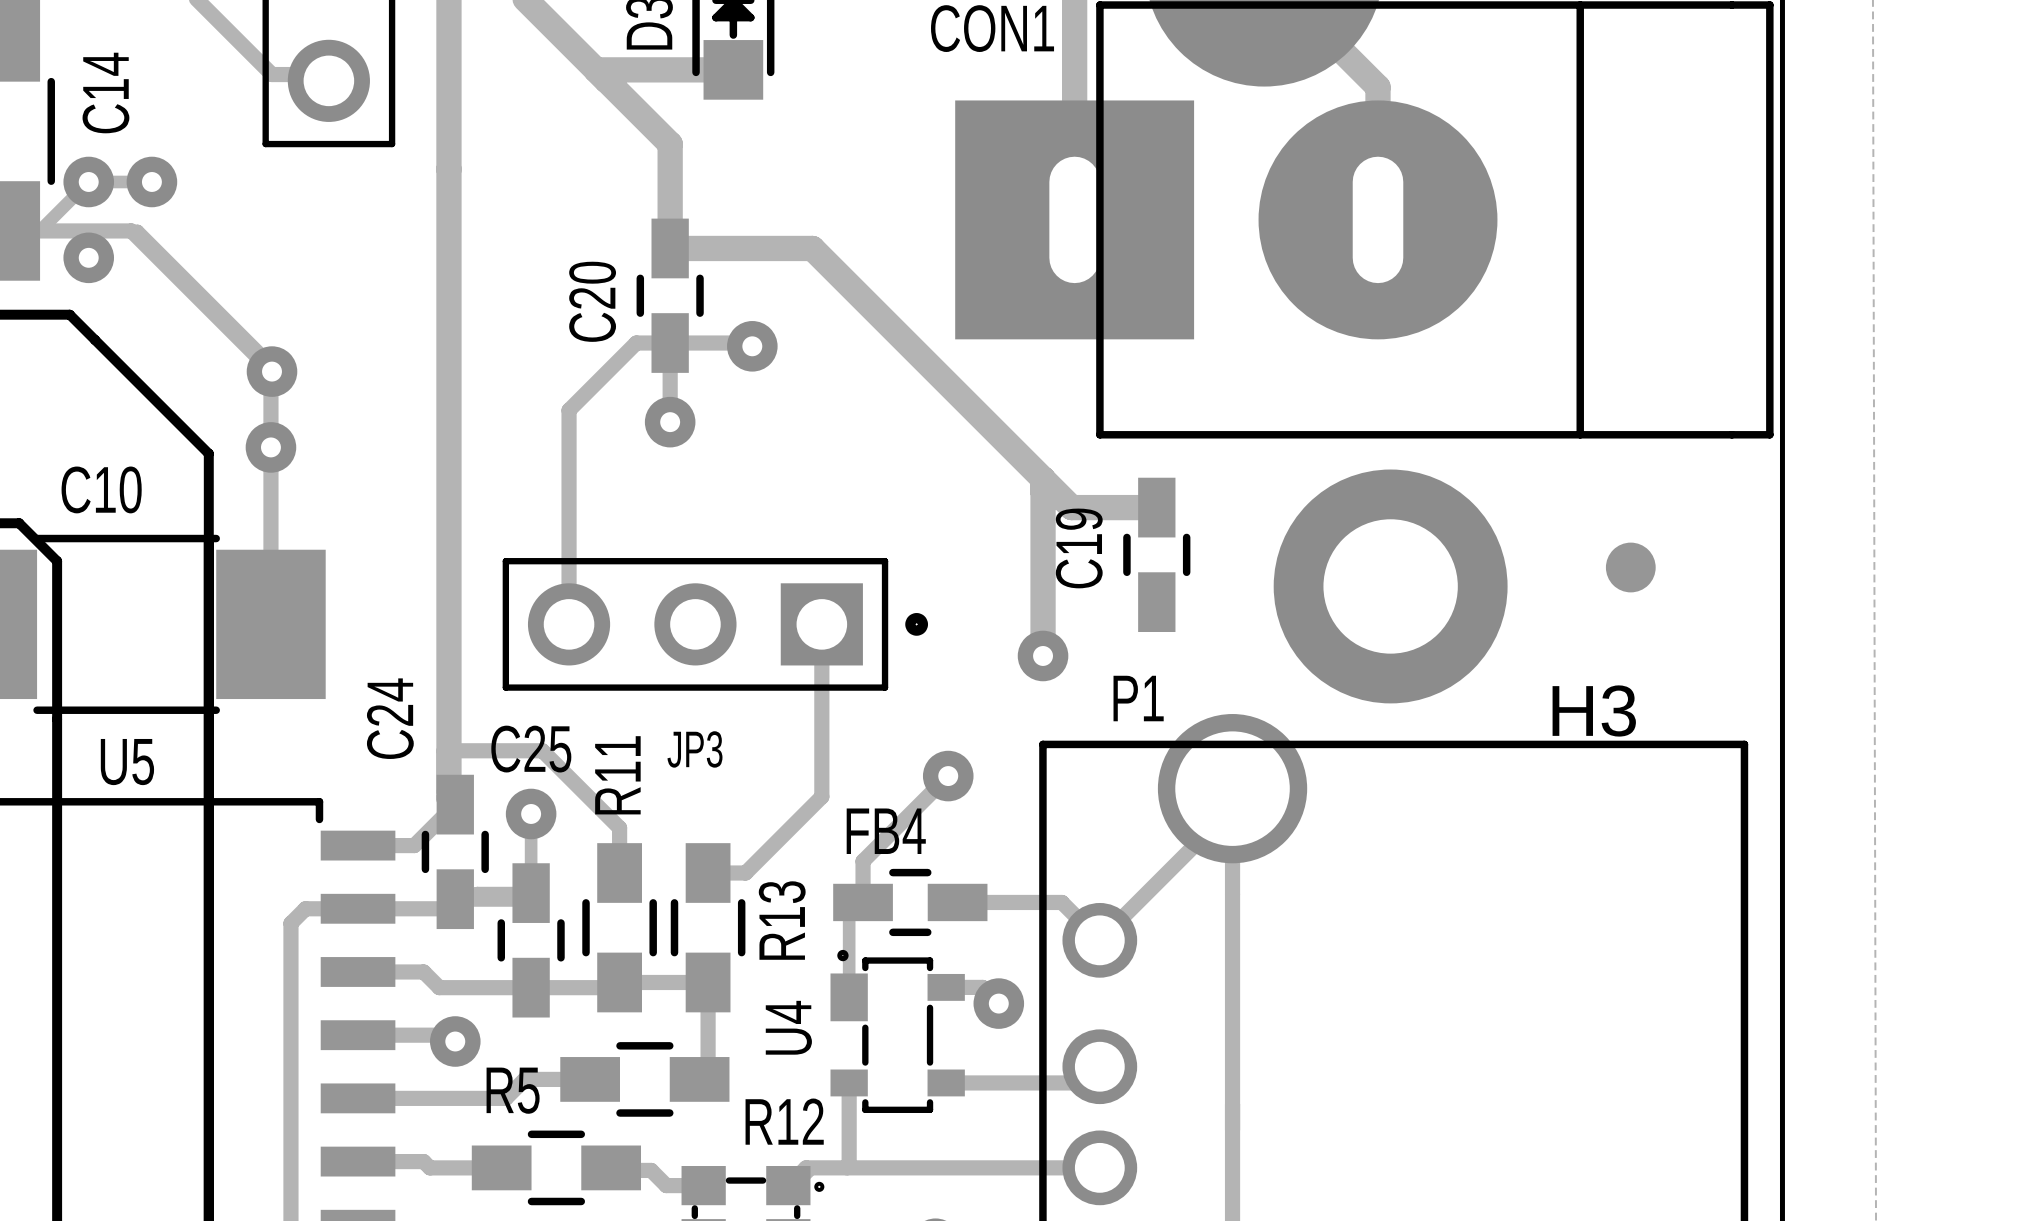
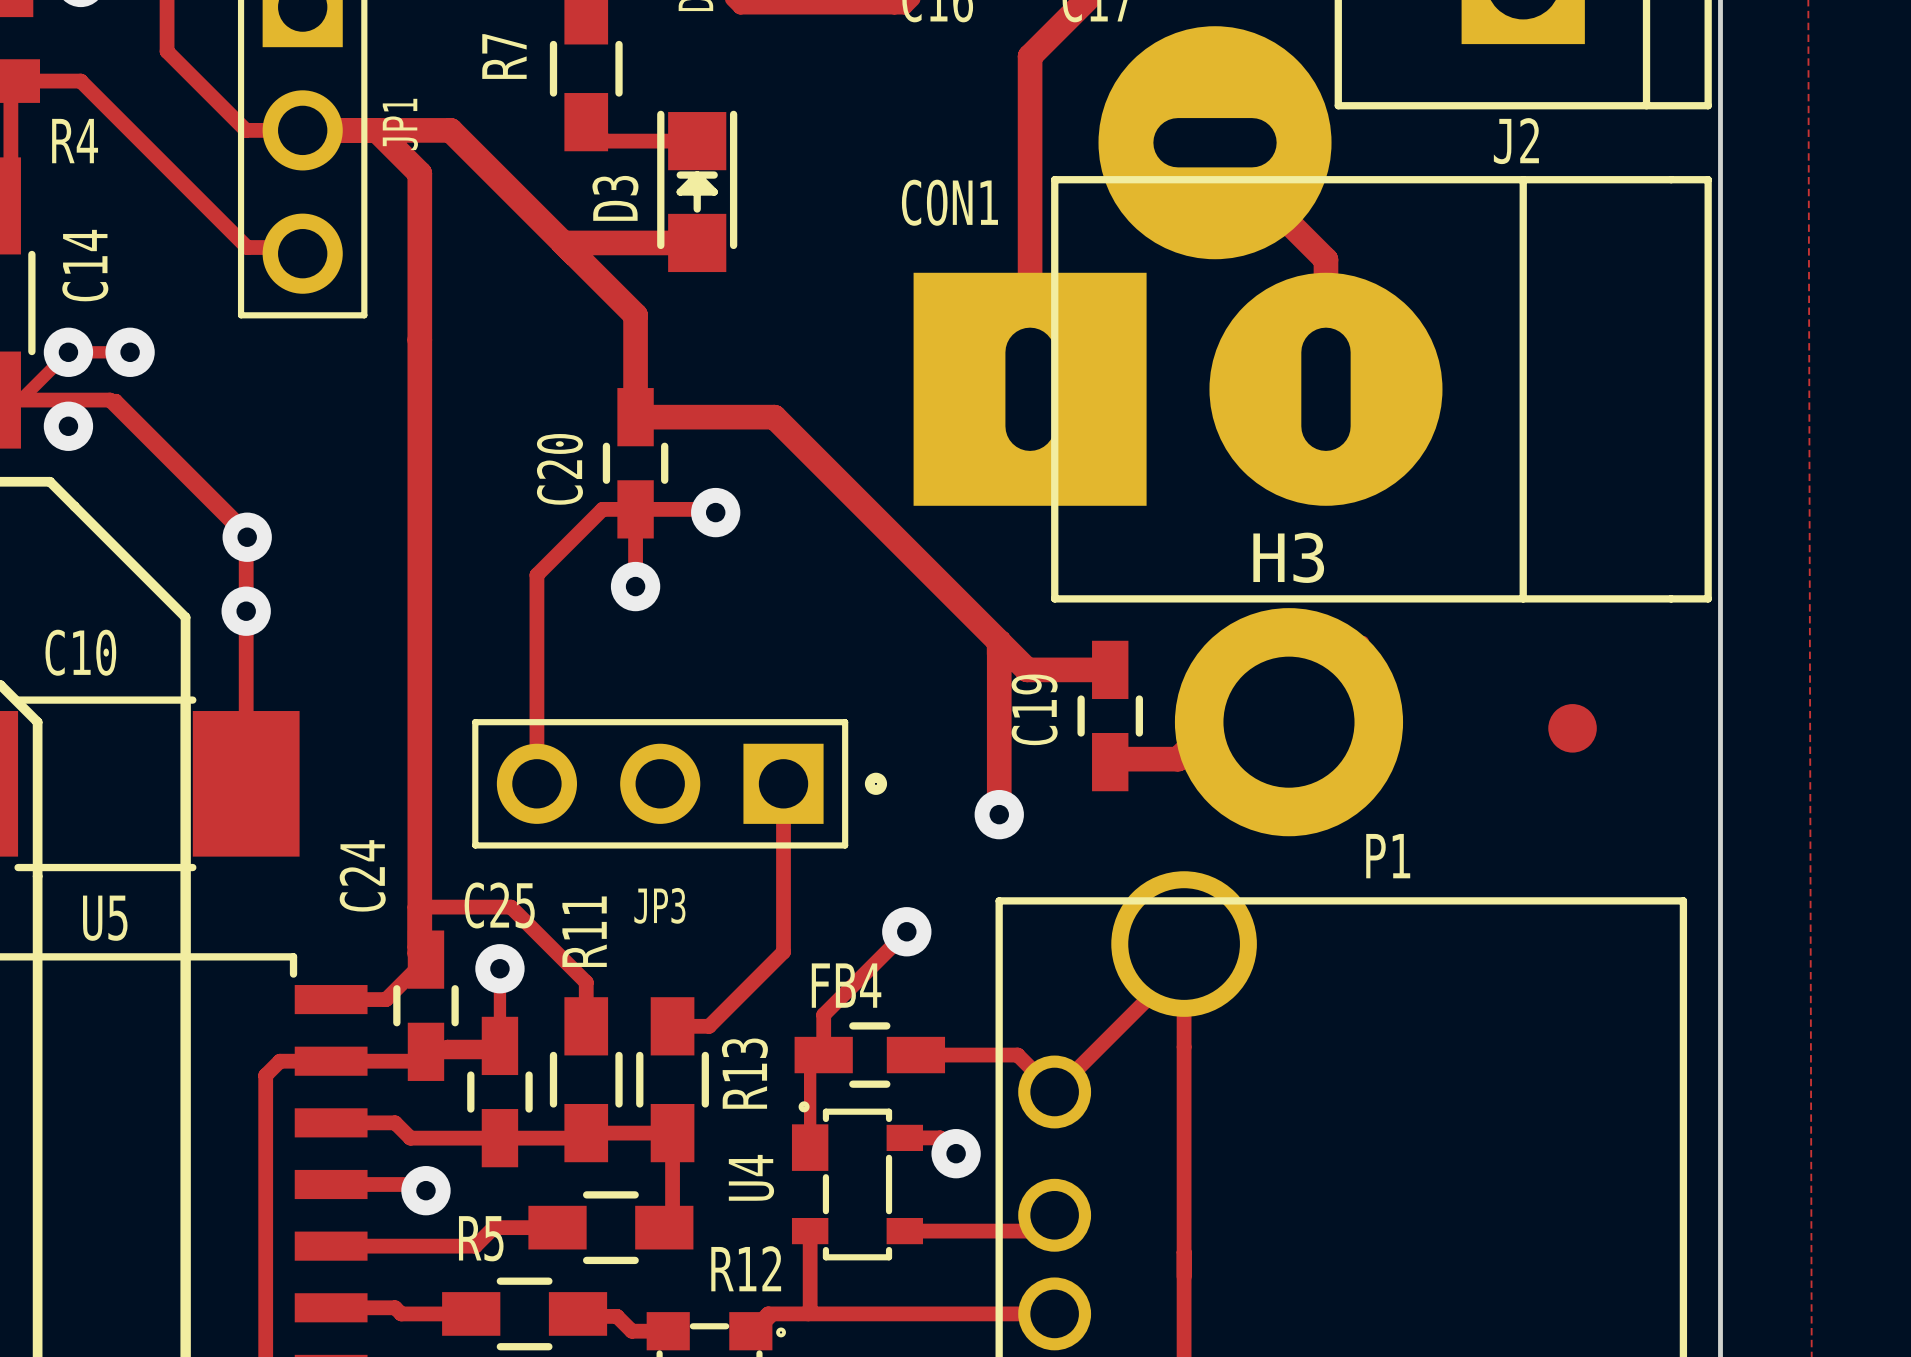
track: none -> (1208, 728) (1178, 759) (1113, 759)
H3 position: (1390, 586) -> (1288, 722)
P1 name position: P1 (1138, 698) -> P1 (1388, 856)
H3 name position: H3 (1594, 710) -> H3 (1288, 557)

